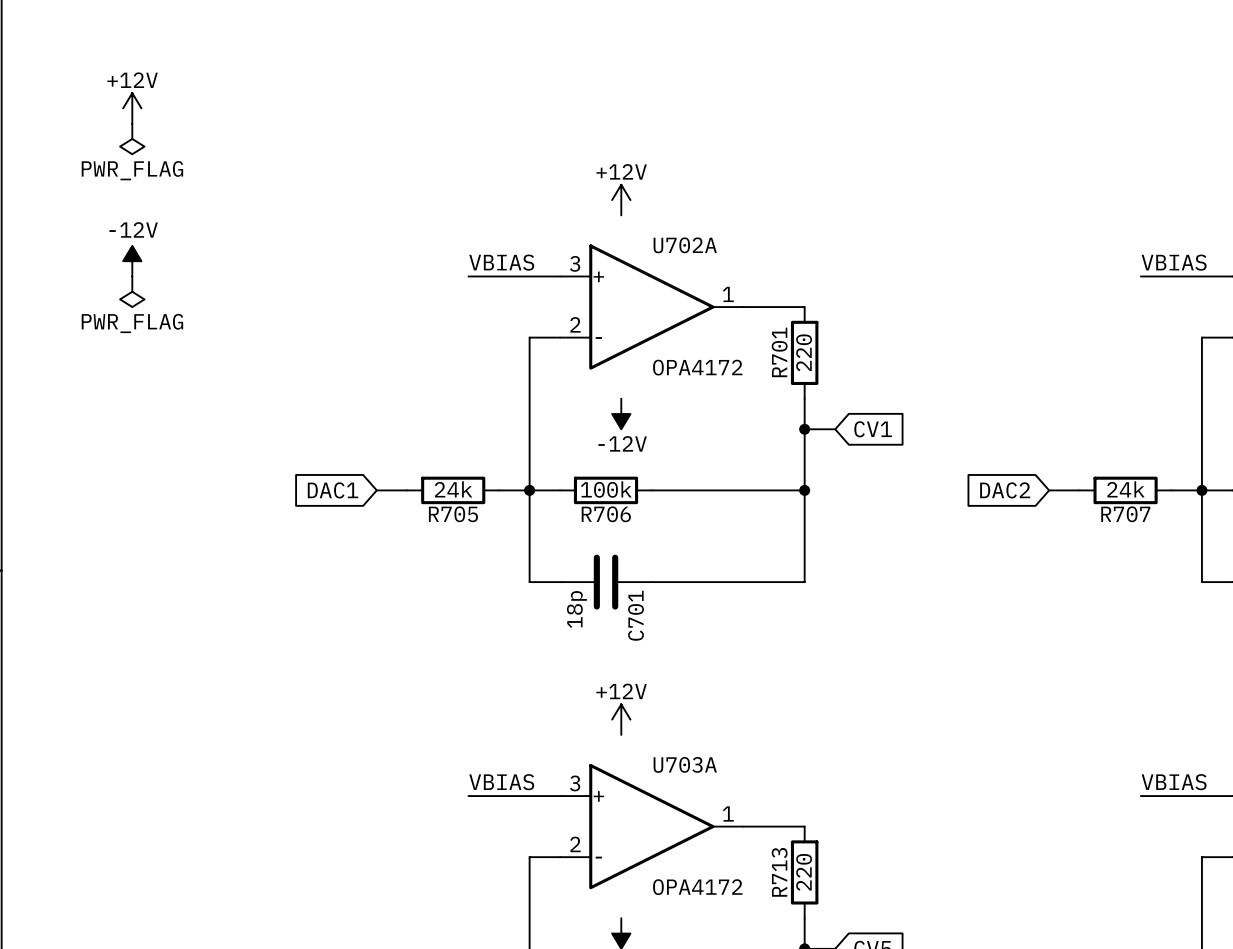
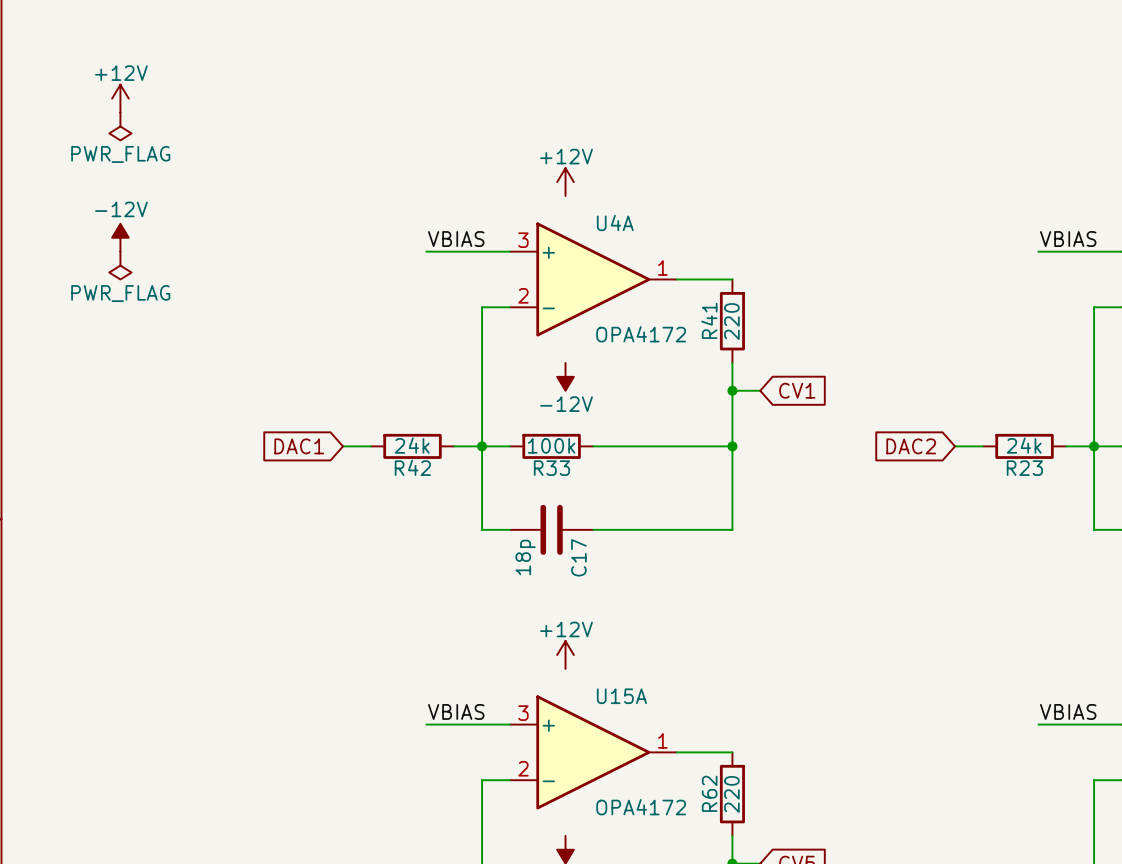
U702A name: U702A (685, 245) -> U4A (615, 222)
R701 name: R701 (779, 352) -> R41 (709, 320)
R705 name: R705 (453, 514) -> R42 (412, 467)
R706 name: R706 (606, 514) -> R33 (551, 468)
R707 name: R707 (1125, 514) -> R23 (1024, 468)
C701 name: C701 (636, 615) -> C17 (578, 557)
U703A name: U703A (685, 764) -> U15A (621, 696)
R713 name: R713 (779, 872) -> R62 (709, 793)

